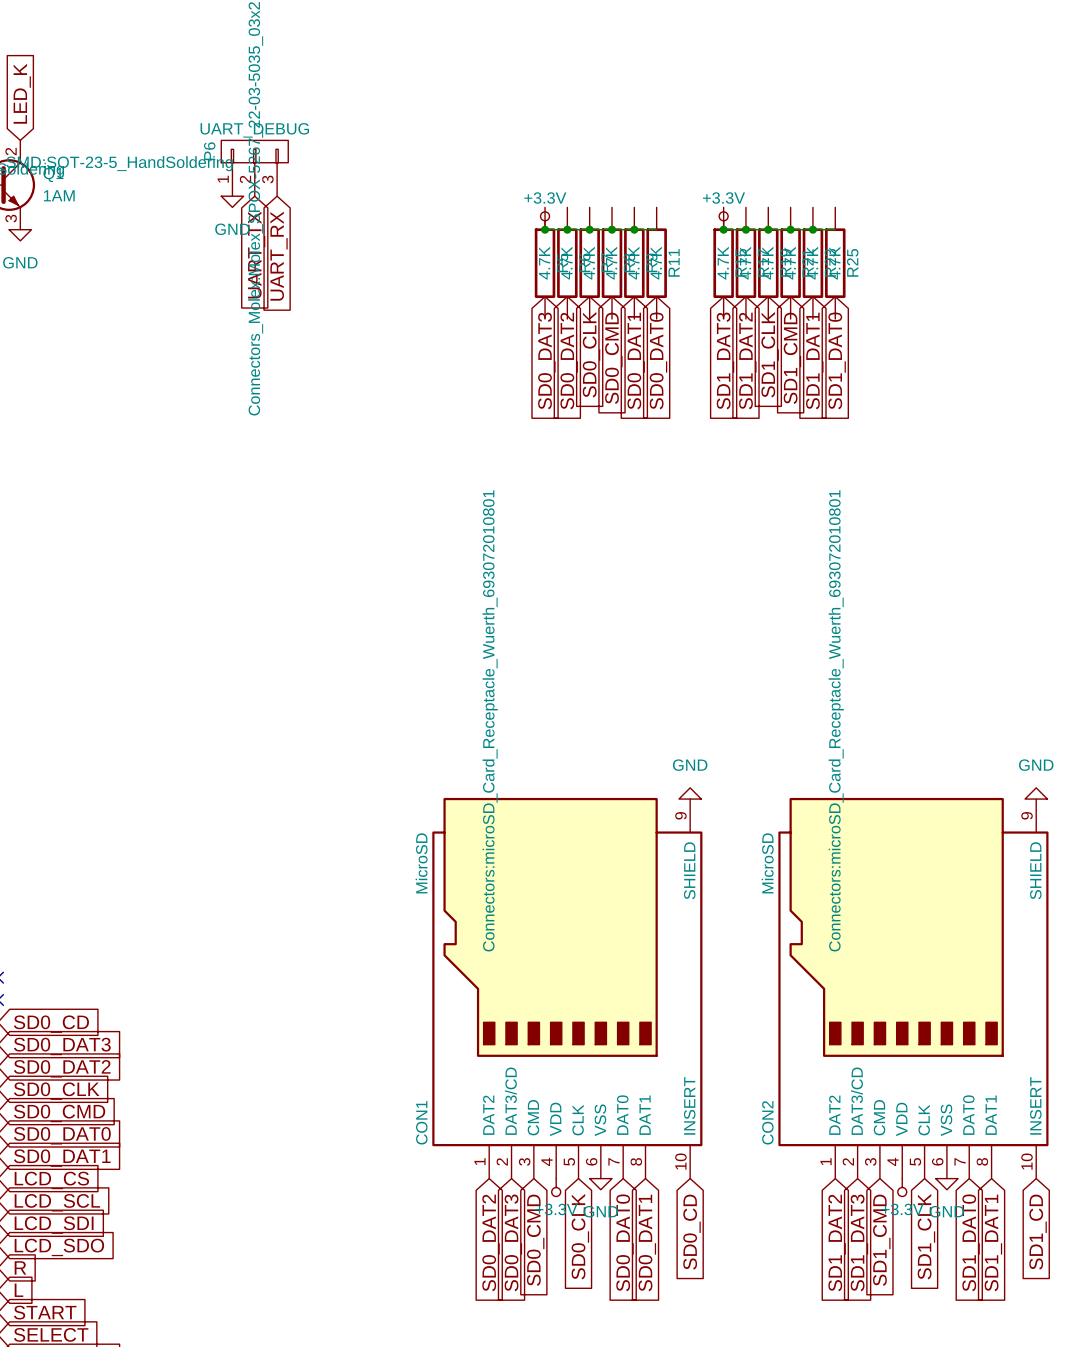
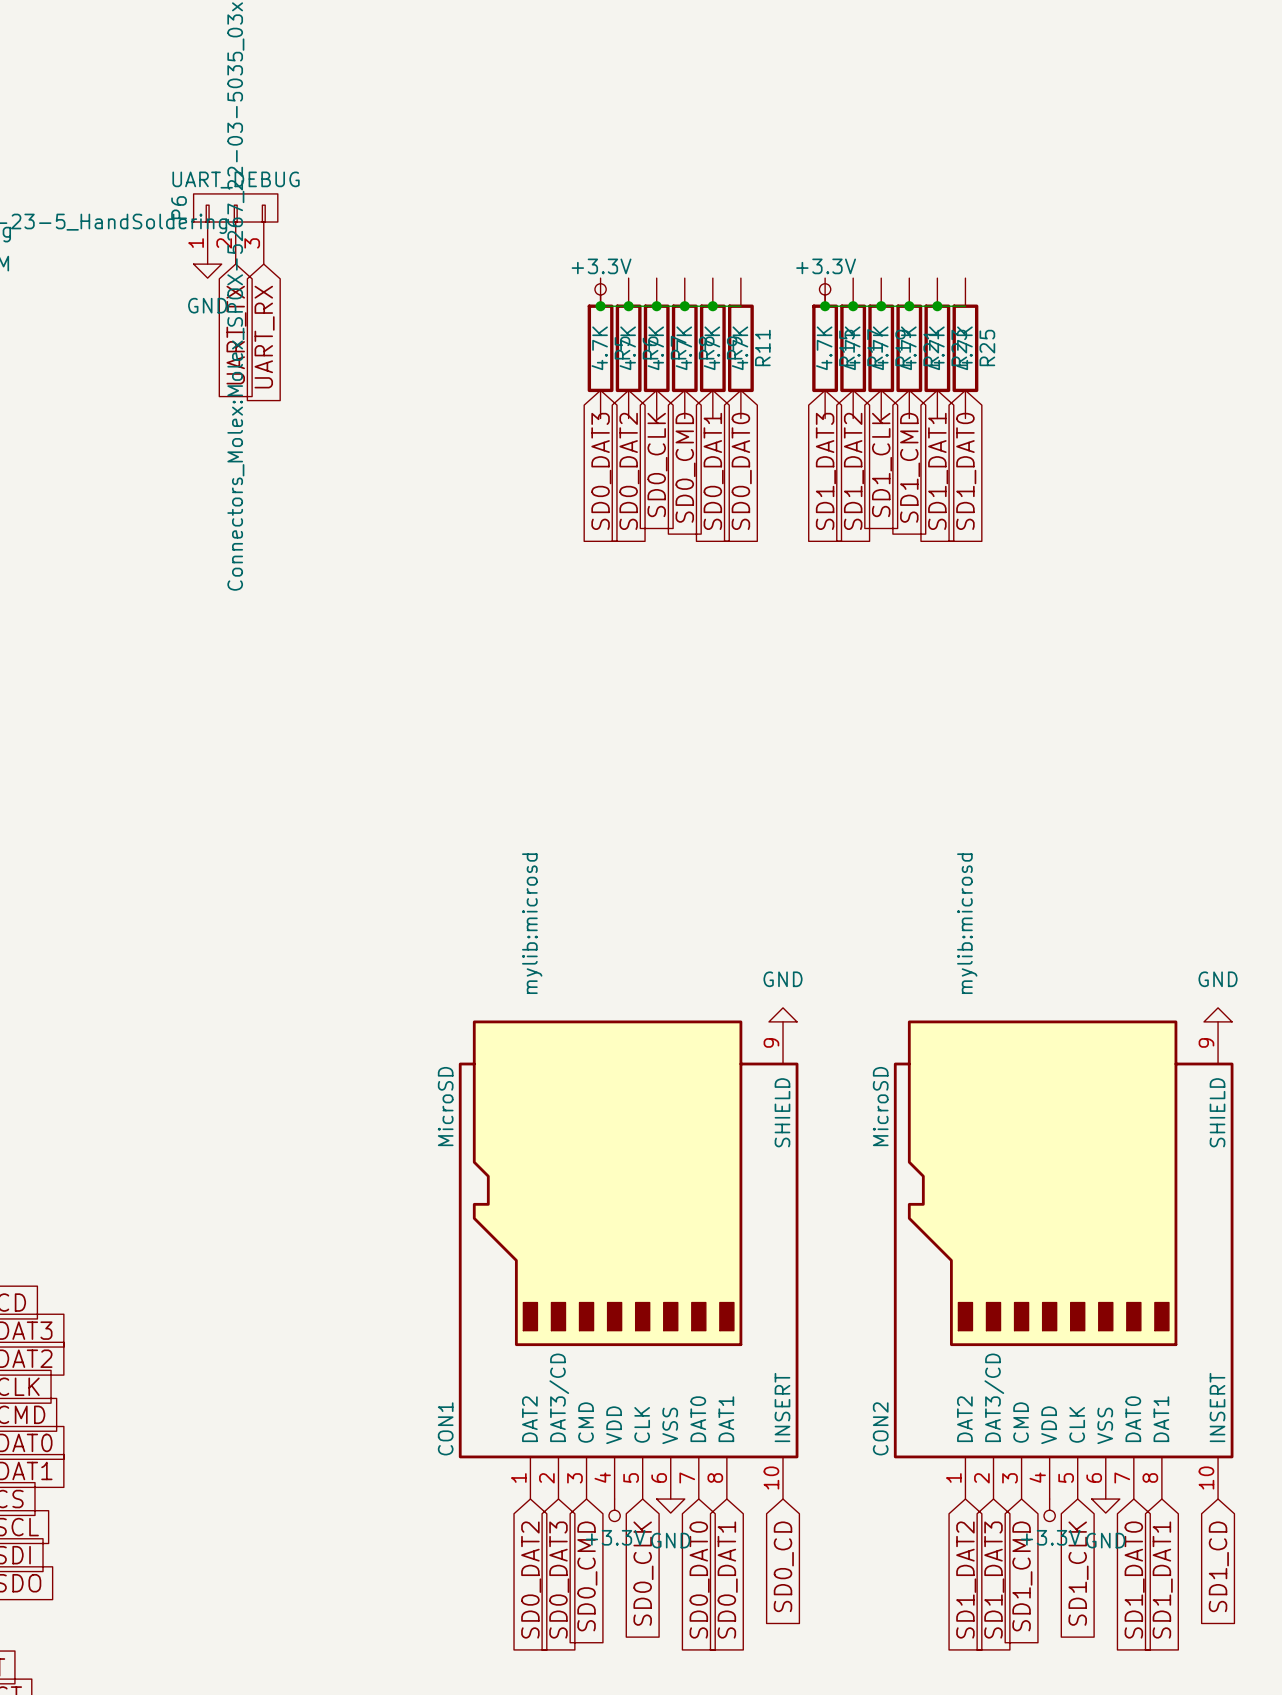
CON1 text: Connectors:microSD_Card_Receptacle_Wuerth_693072010801 (490, 720) -> mylib:microsd (532, 923)
CON2 text: Connectors:microSD_Card_Receptacle_Wuerth_693072010801 (836, 720) -> mylib:microsd (967, 923)

